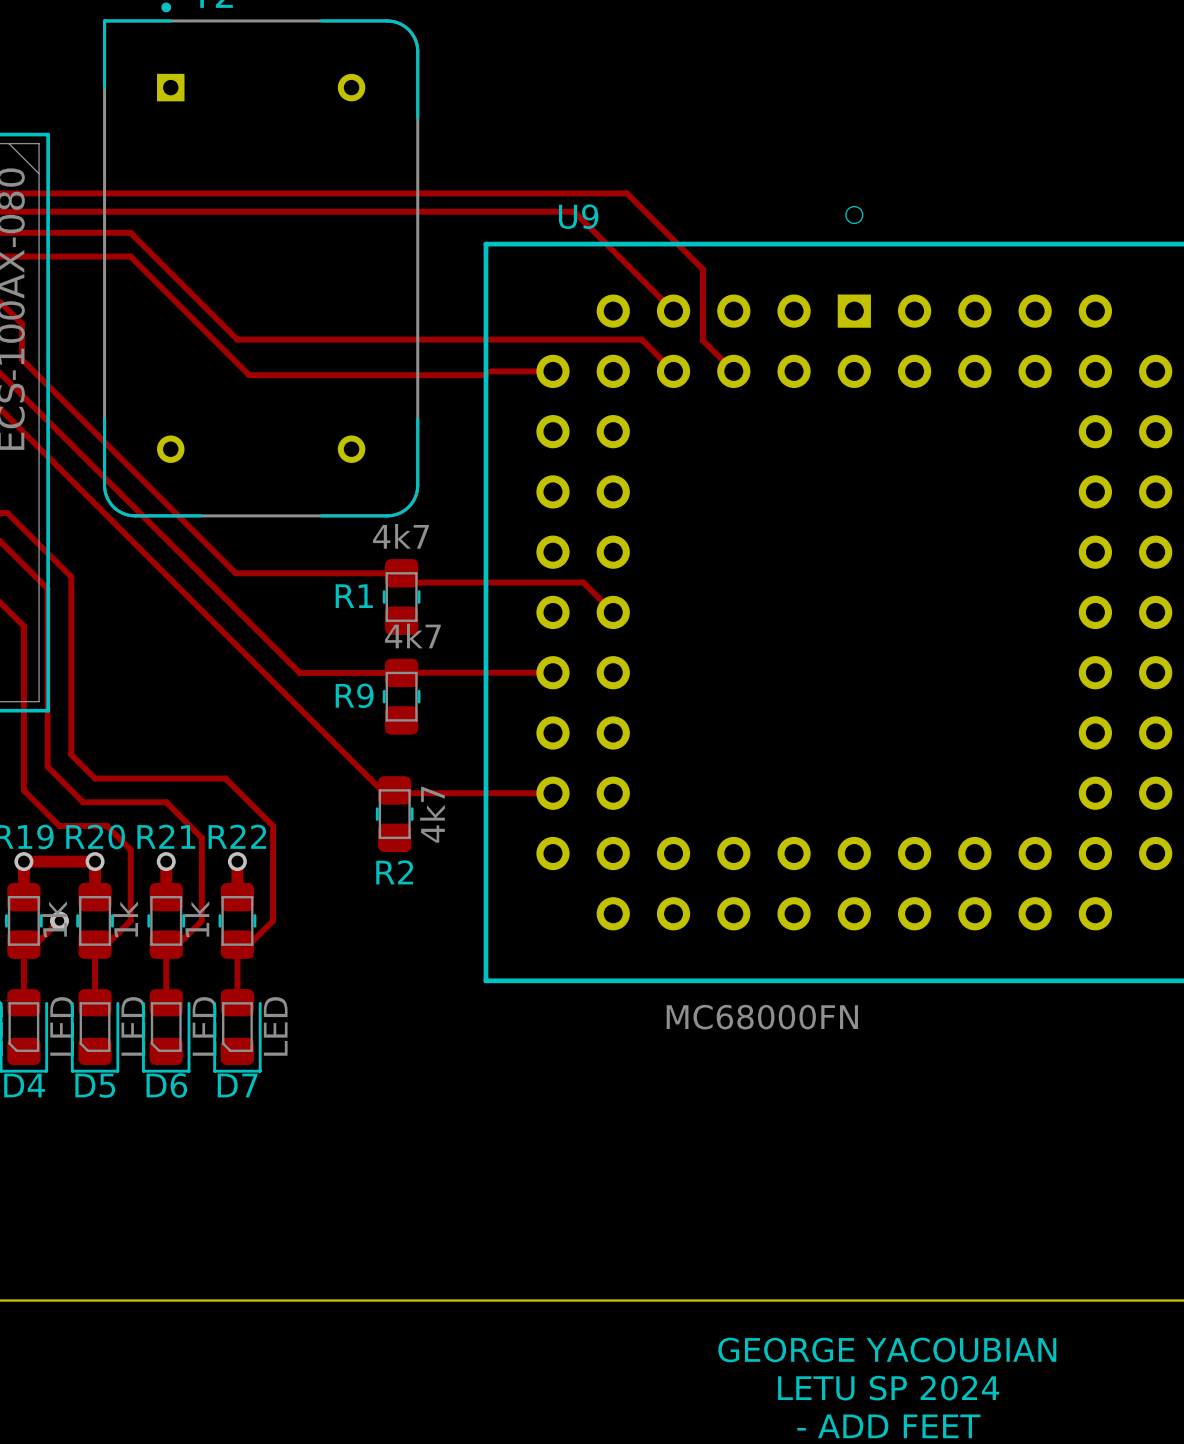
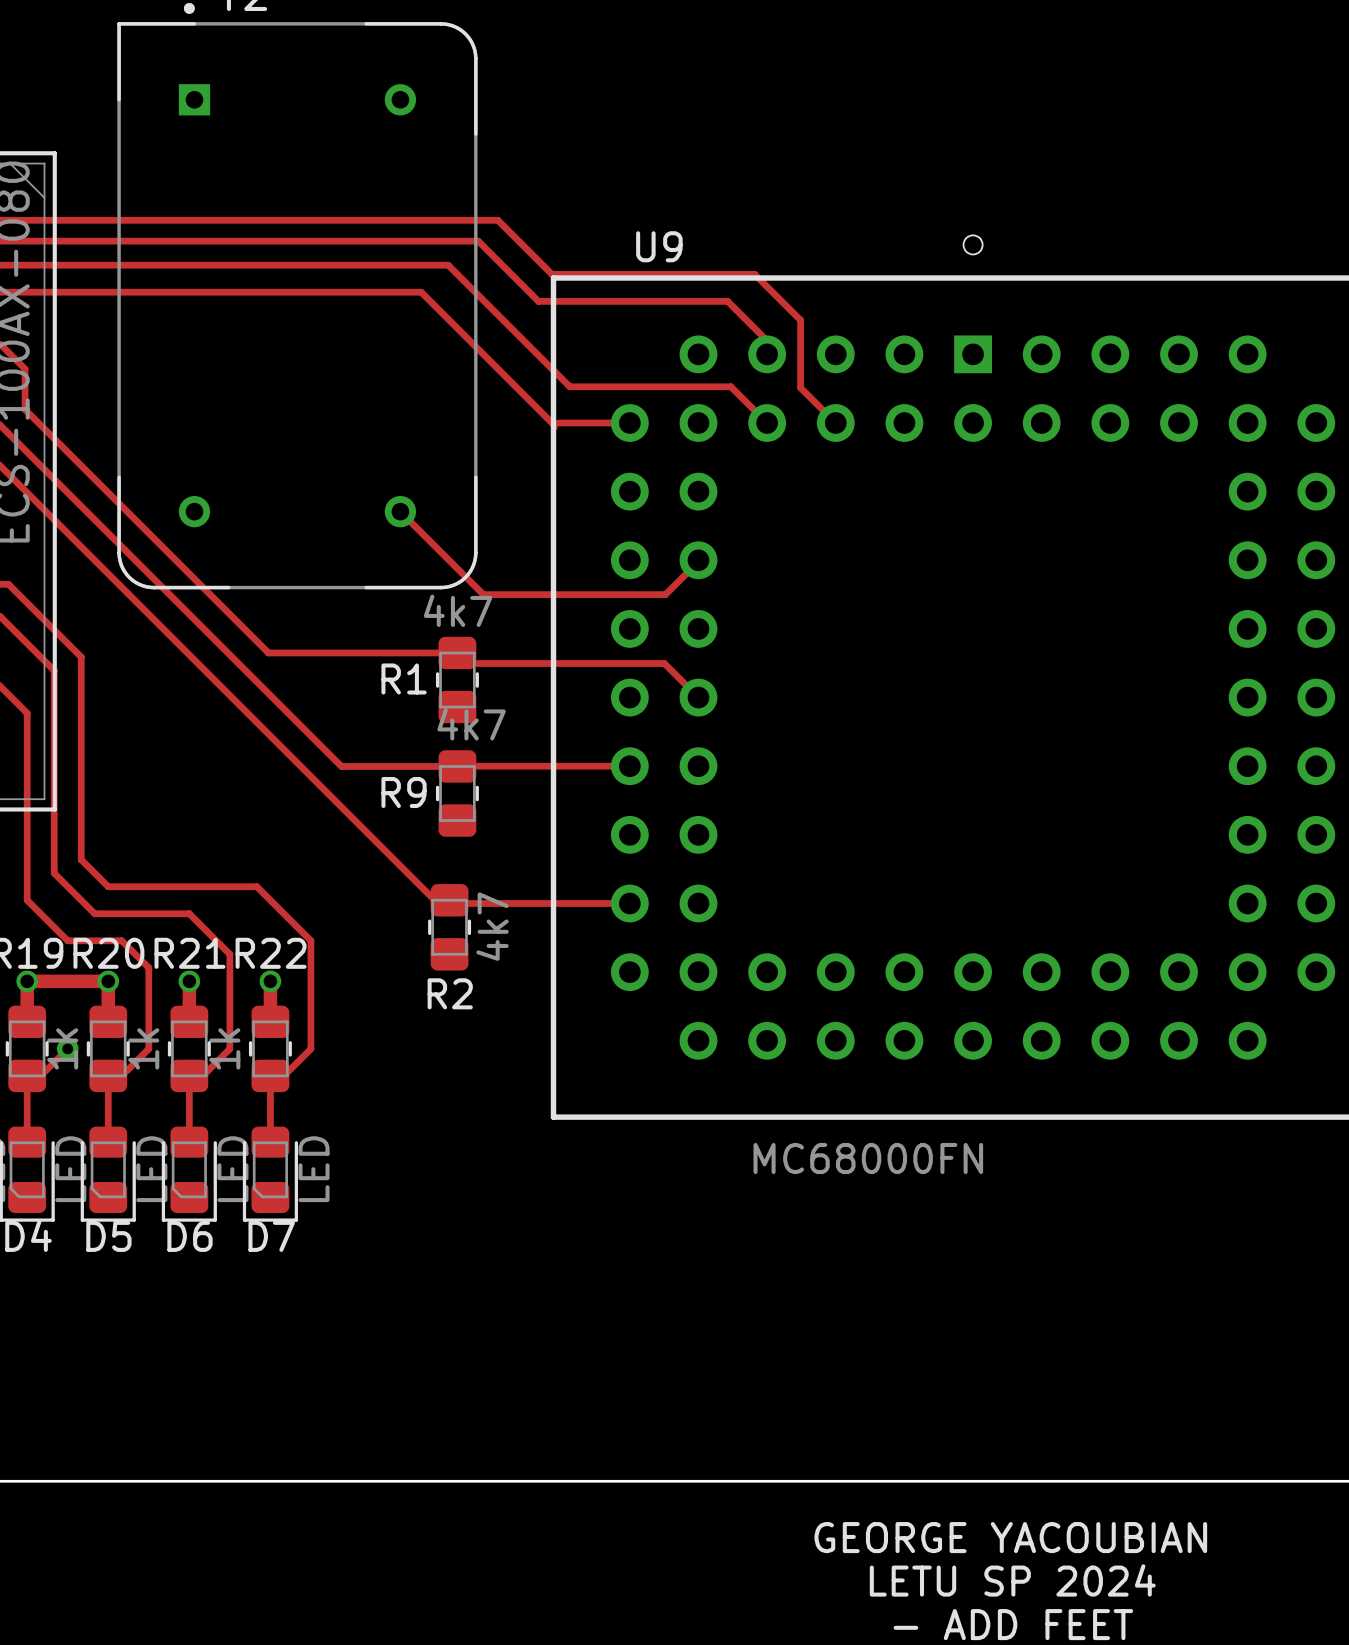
track: (437, 193) (627, 193) (702, 269) (702, 281) -> (497, 220) (552, 274) (754, 274) (800, 320)
track: (419, 211) (574, 211) (673, 311) -> (478, 241) (538, 301) (727, 301) (768, 341) (767, 354)
track: (130, 232) (237, 339) (500, 339) -> (148, 265) (448, 265) (569, 386)
track: (130, 256) (249, 375) (486, 375) -> (148, 292) (421, 292) (554, 425) (554, 427)
track: none -> (400, 511) (483, 594) (665, 594) (698, 560)

